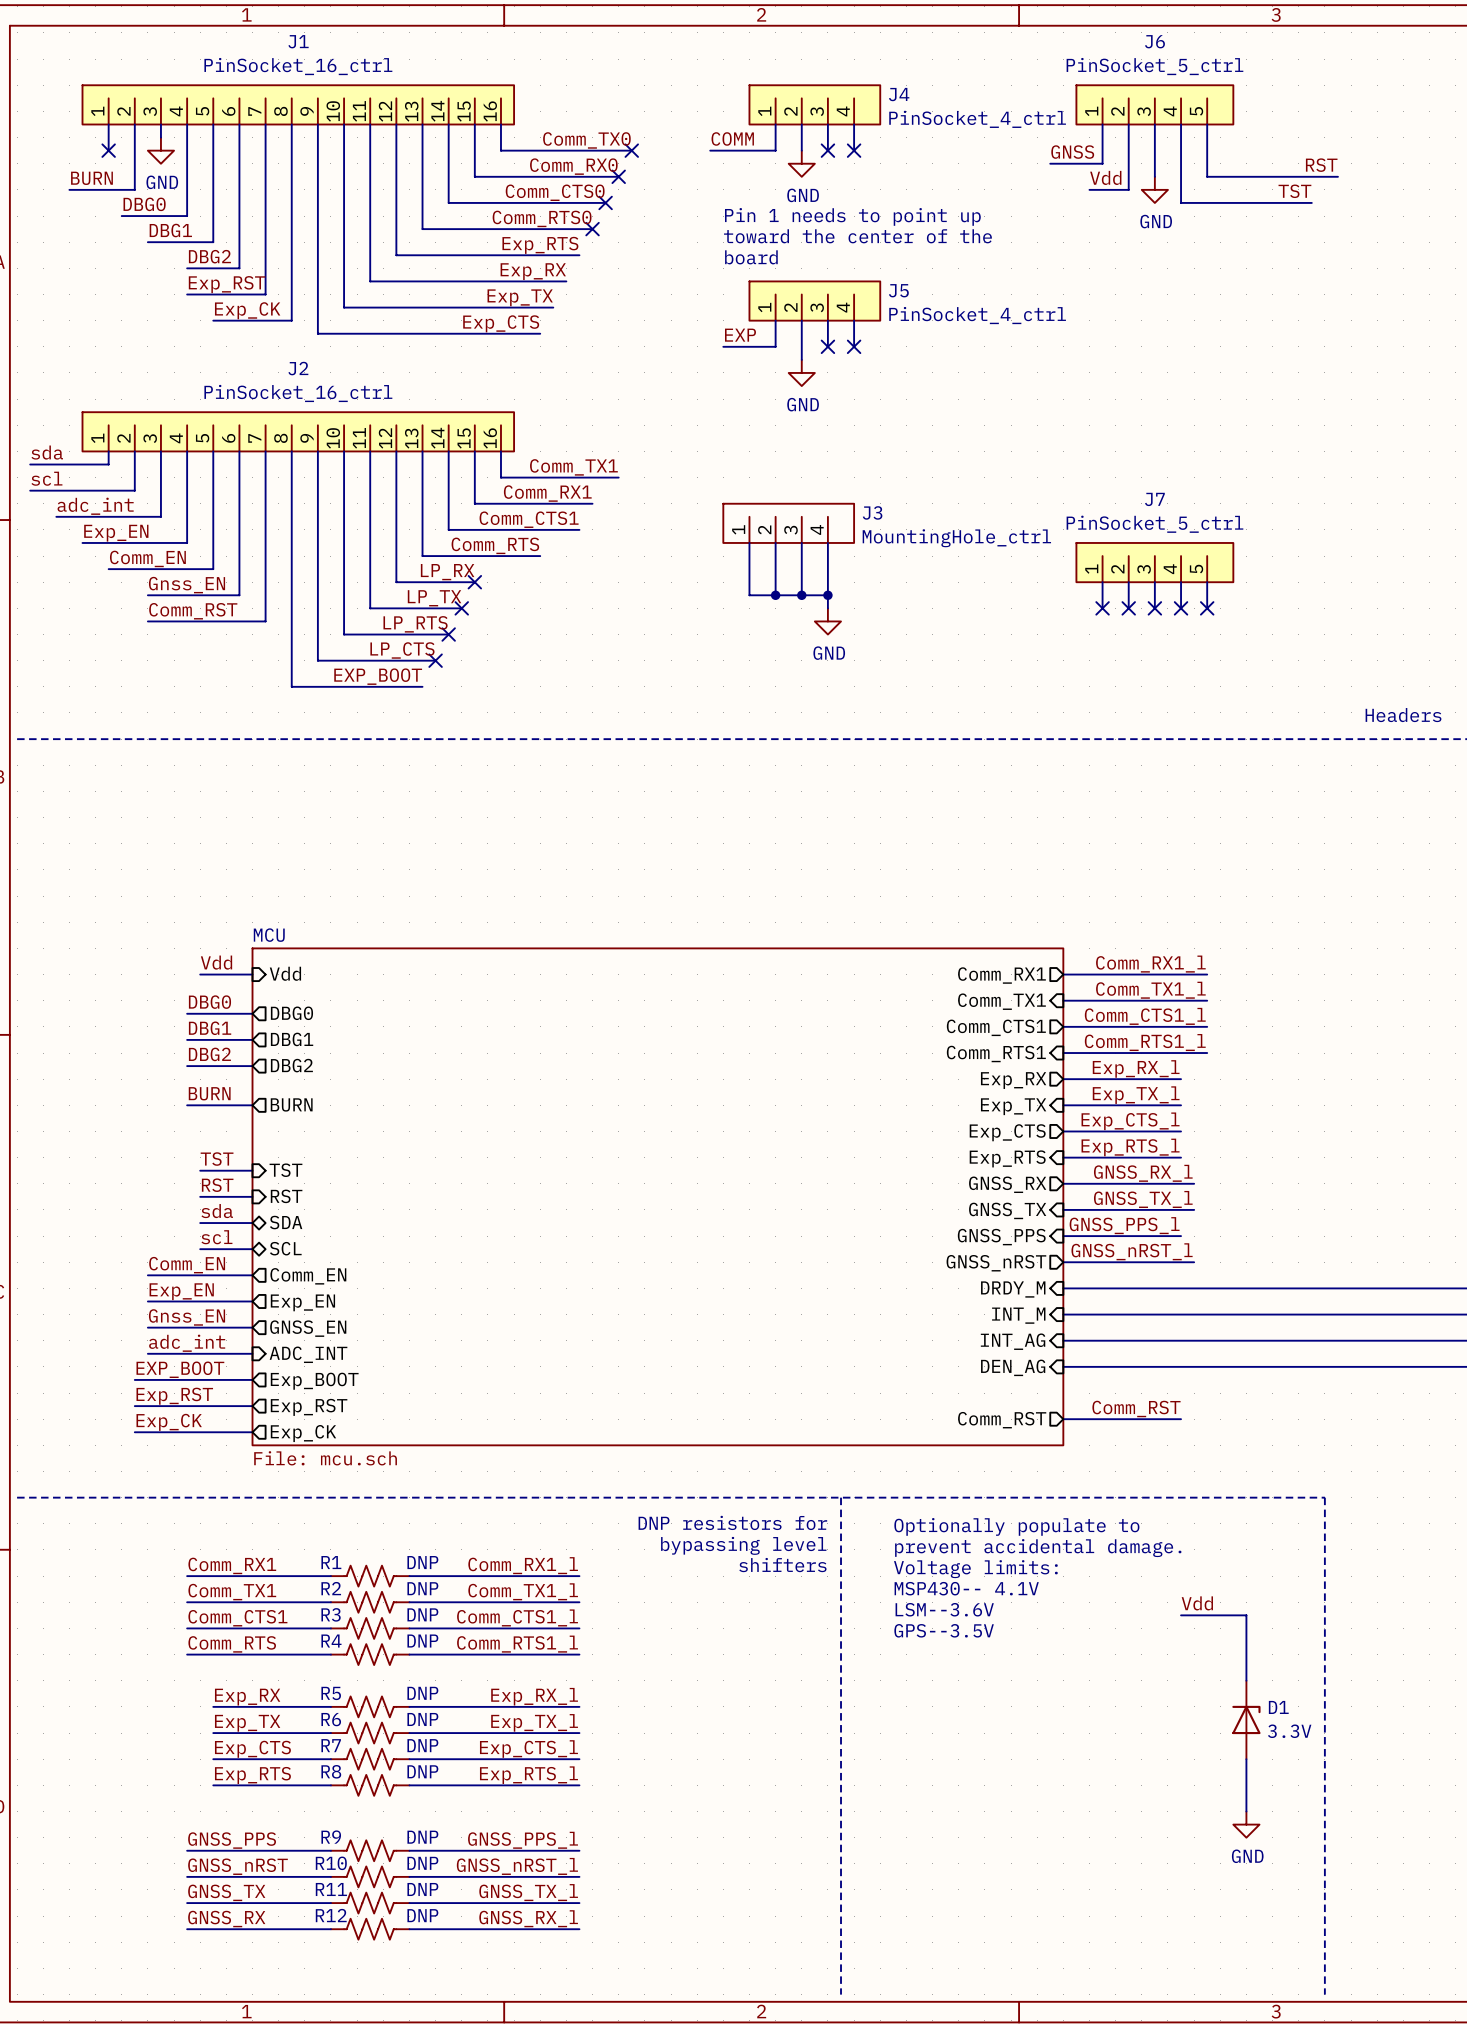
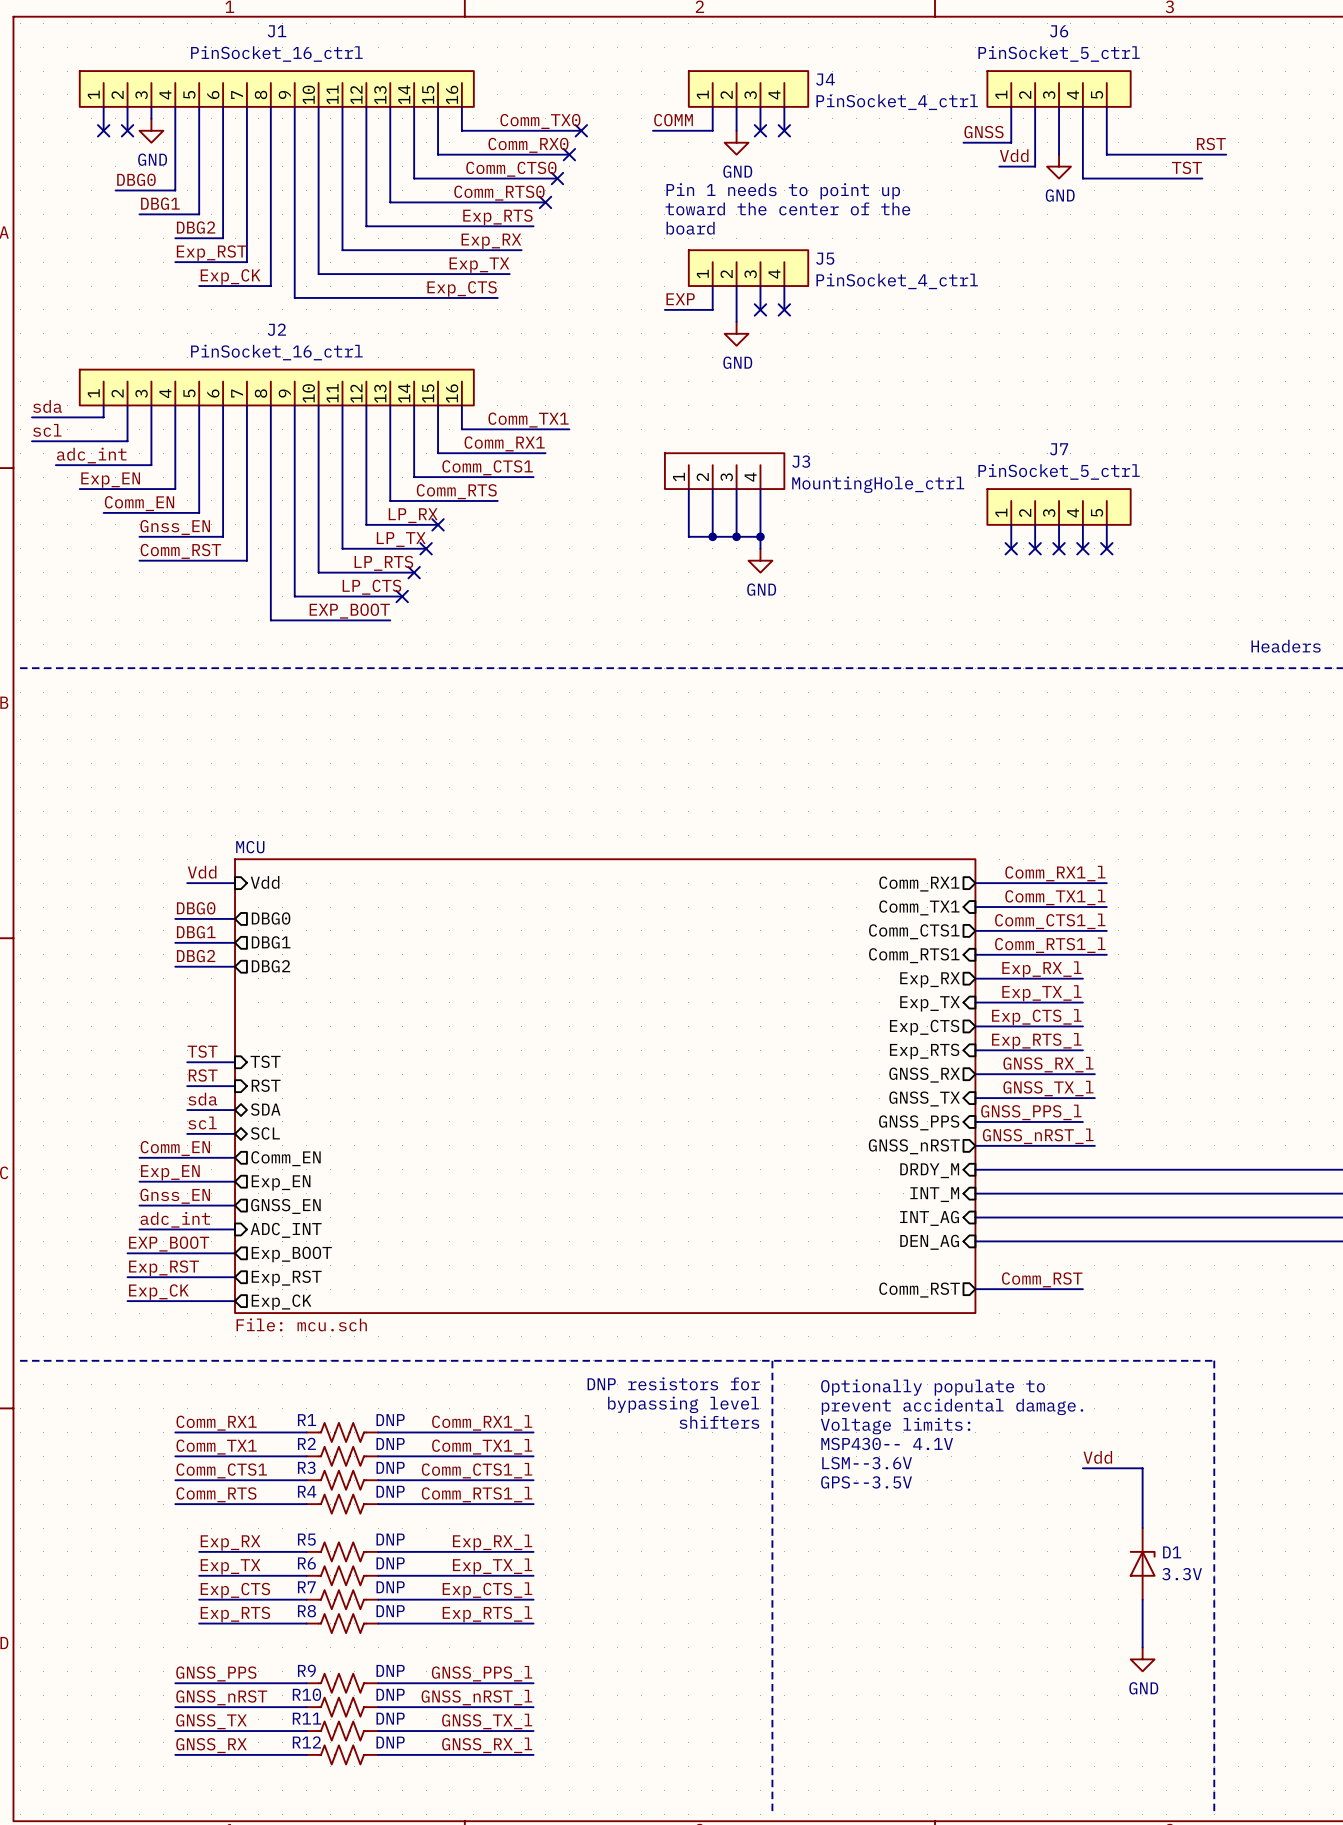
wire: (134, 150) (134, 189) (69, 189) -> none
no-connect mark: none -> (127, 130)
label: BURN (91, 178) -> none
label: BURN (209, 1093) -> none
sheet pin: BURN (291, 1104) -> none
wire: (187, 1105) (252, 1105) -> none

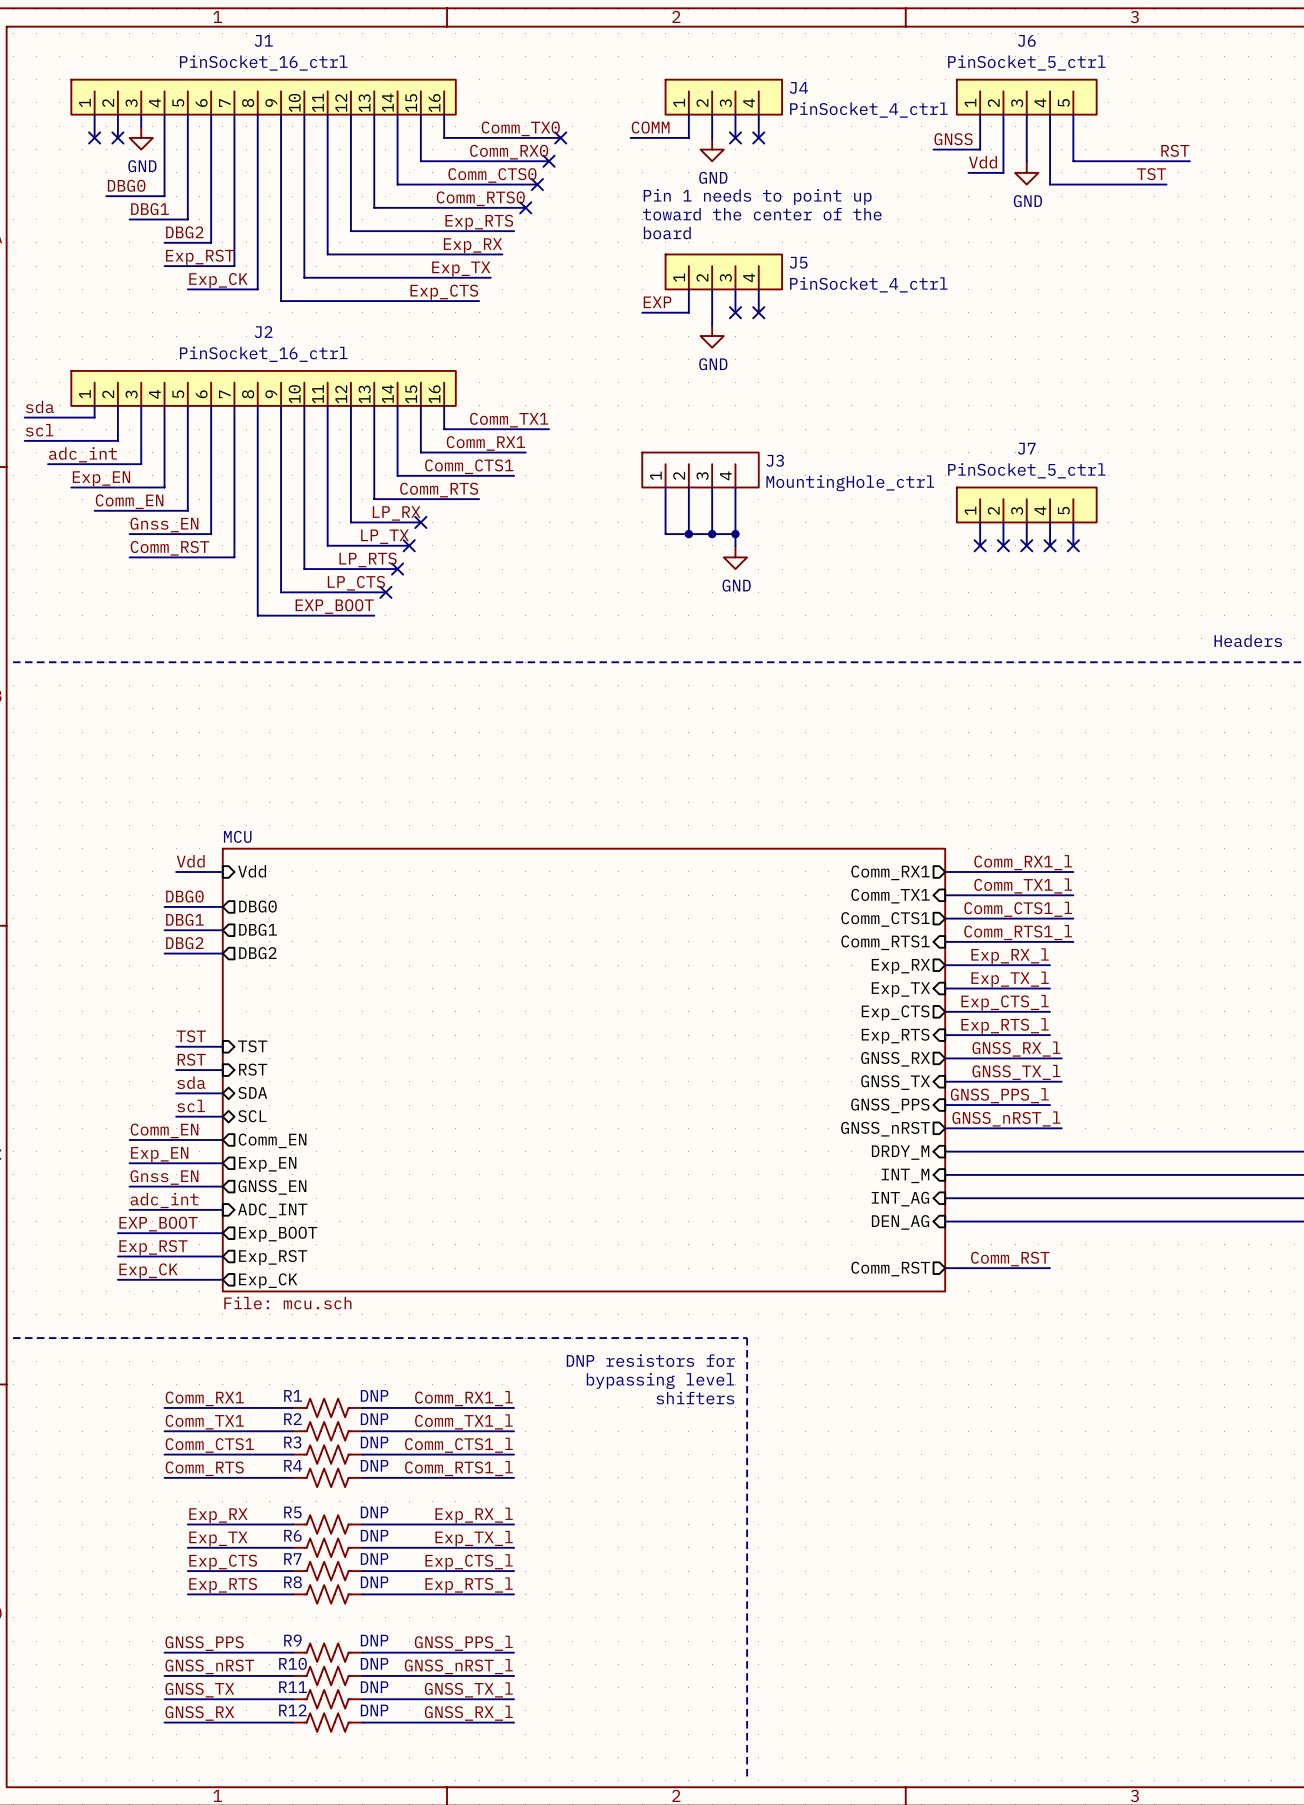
line: (772, 1360) (1214, 1360) (1214, 1814) -> none
text: Optionally populate to (933, 1387) -> none
text: prevent accidental damage. (952, 1406) -> none
text: Voltage limits: (895, 1426) -> none
text: MSP430-- 4.1V (887, 1443) -> none
label: Vdd (1097, 1457) -> none
text: LSM--3.6V (867, 1463) -> none
wire: (1082, 1468) (1142, 1468) (1142, 1528) -> none
text: GPS--3.5V (866, 1482) -> none
D1: 3.3V (1142, 1563) -> none
wire: (1142, 1599) (1142, 1647) -> none
power symbol: GND (1142, 1659) -> none

